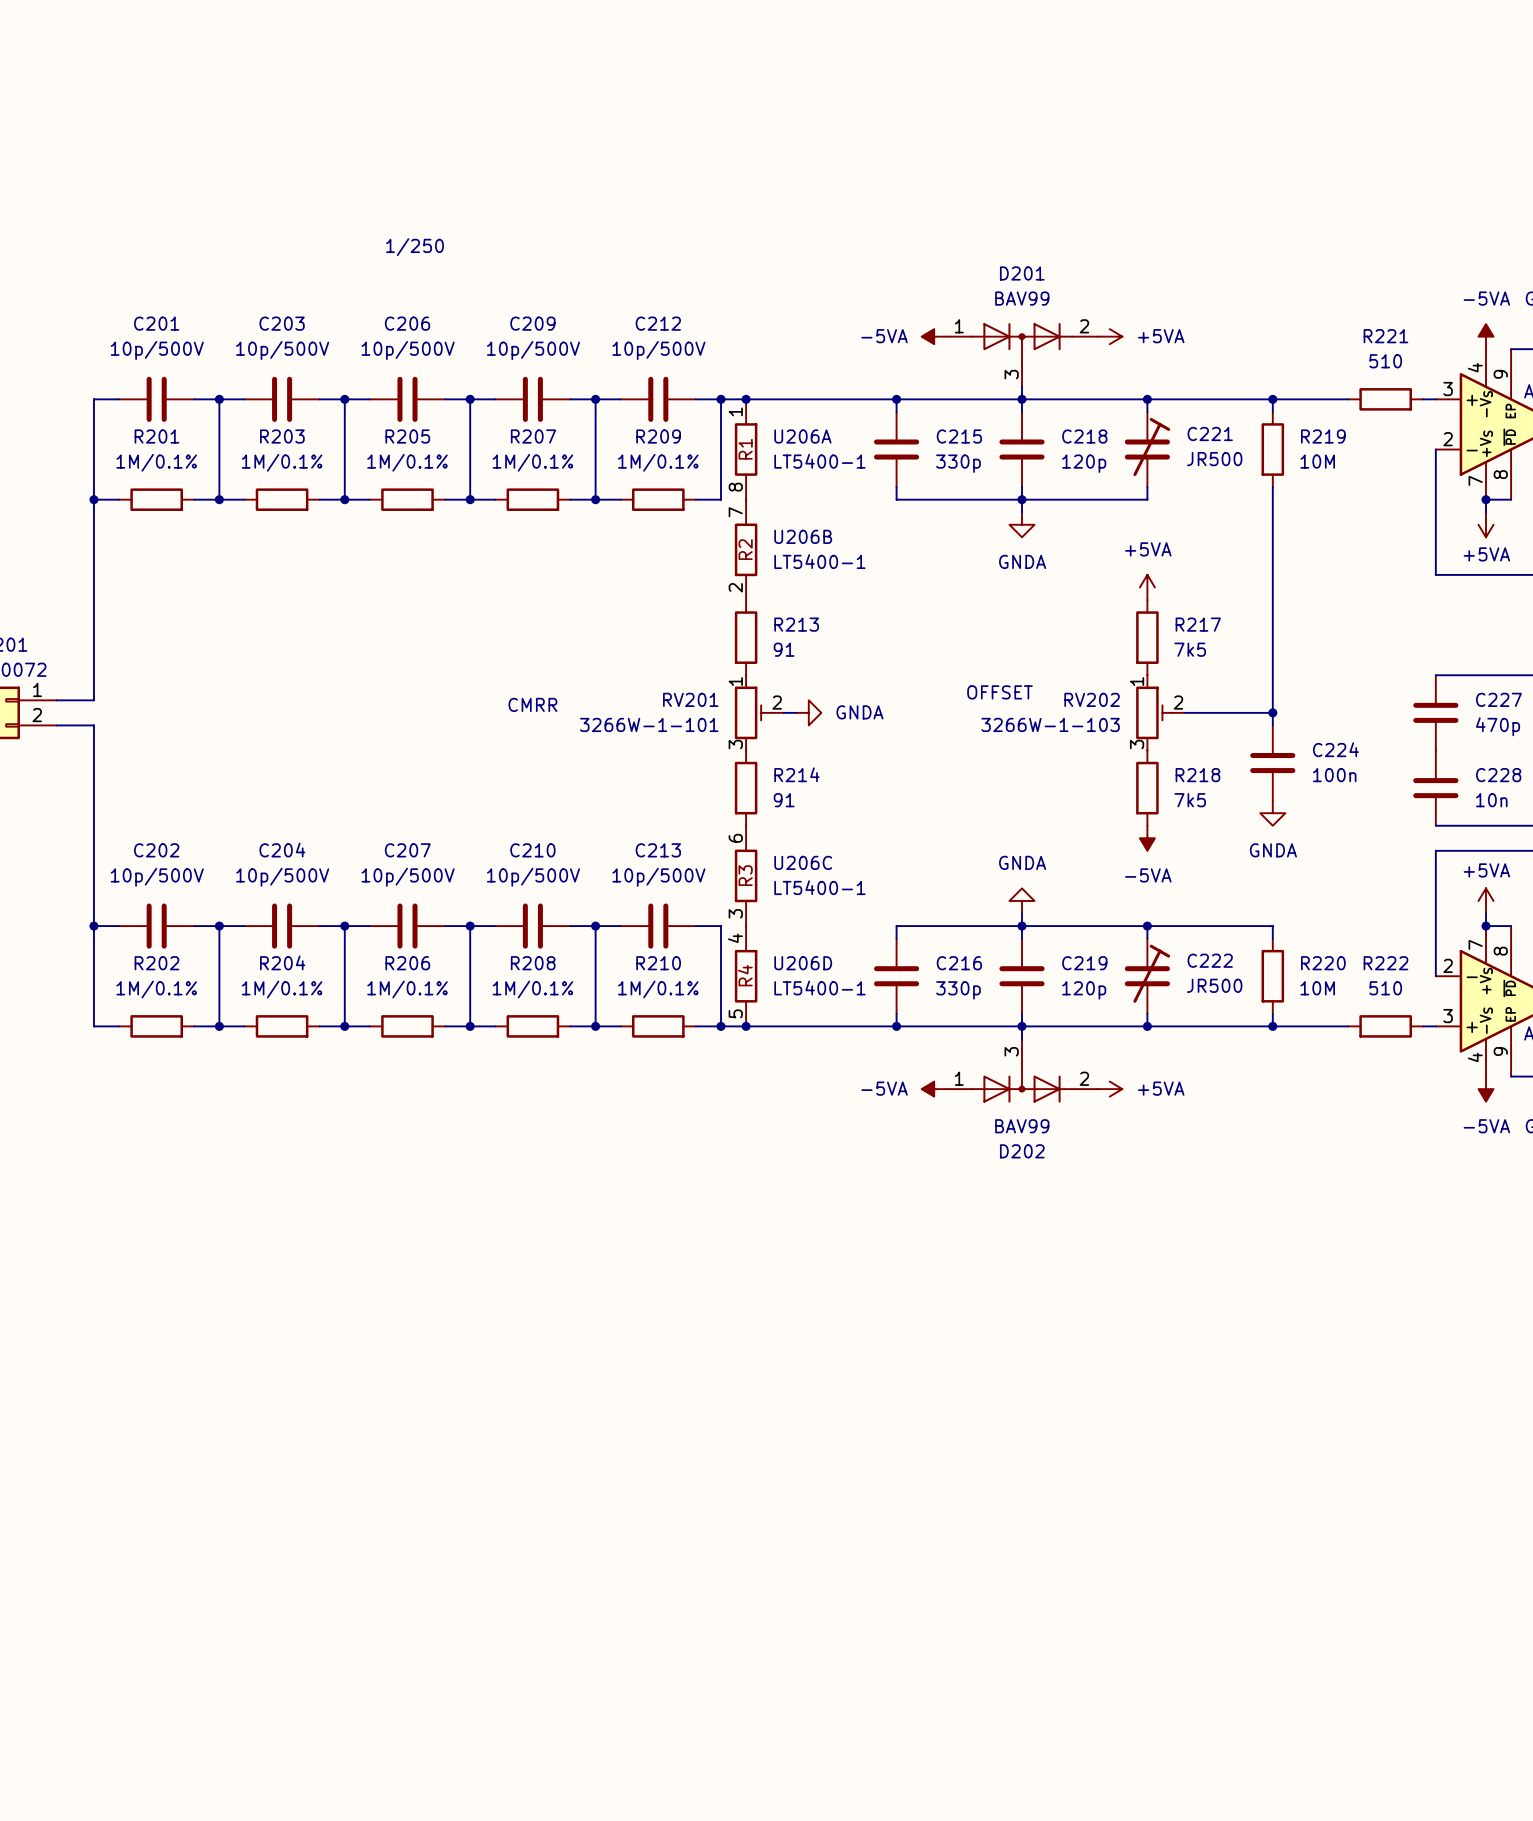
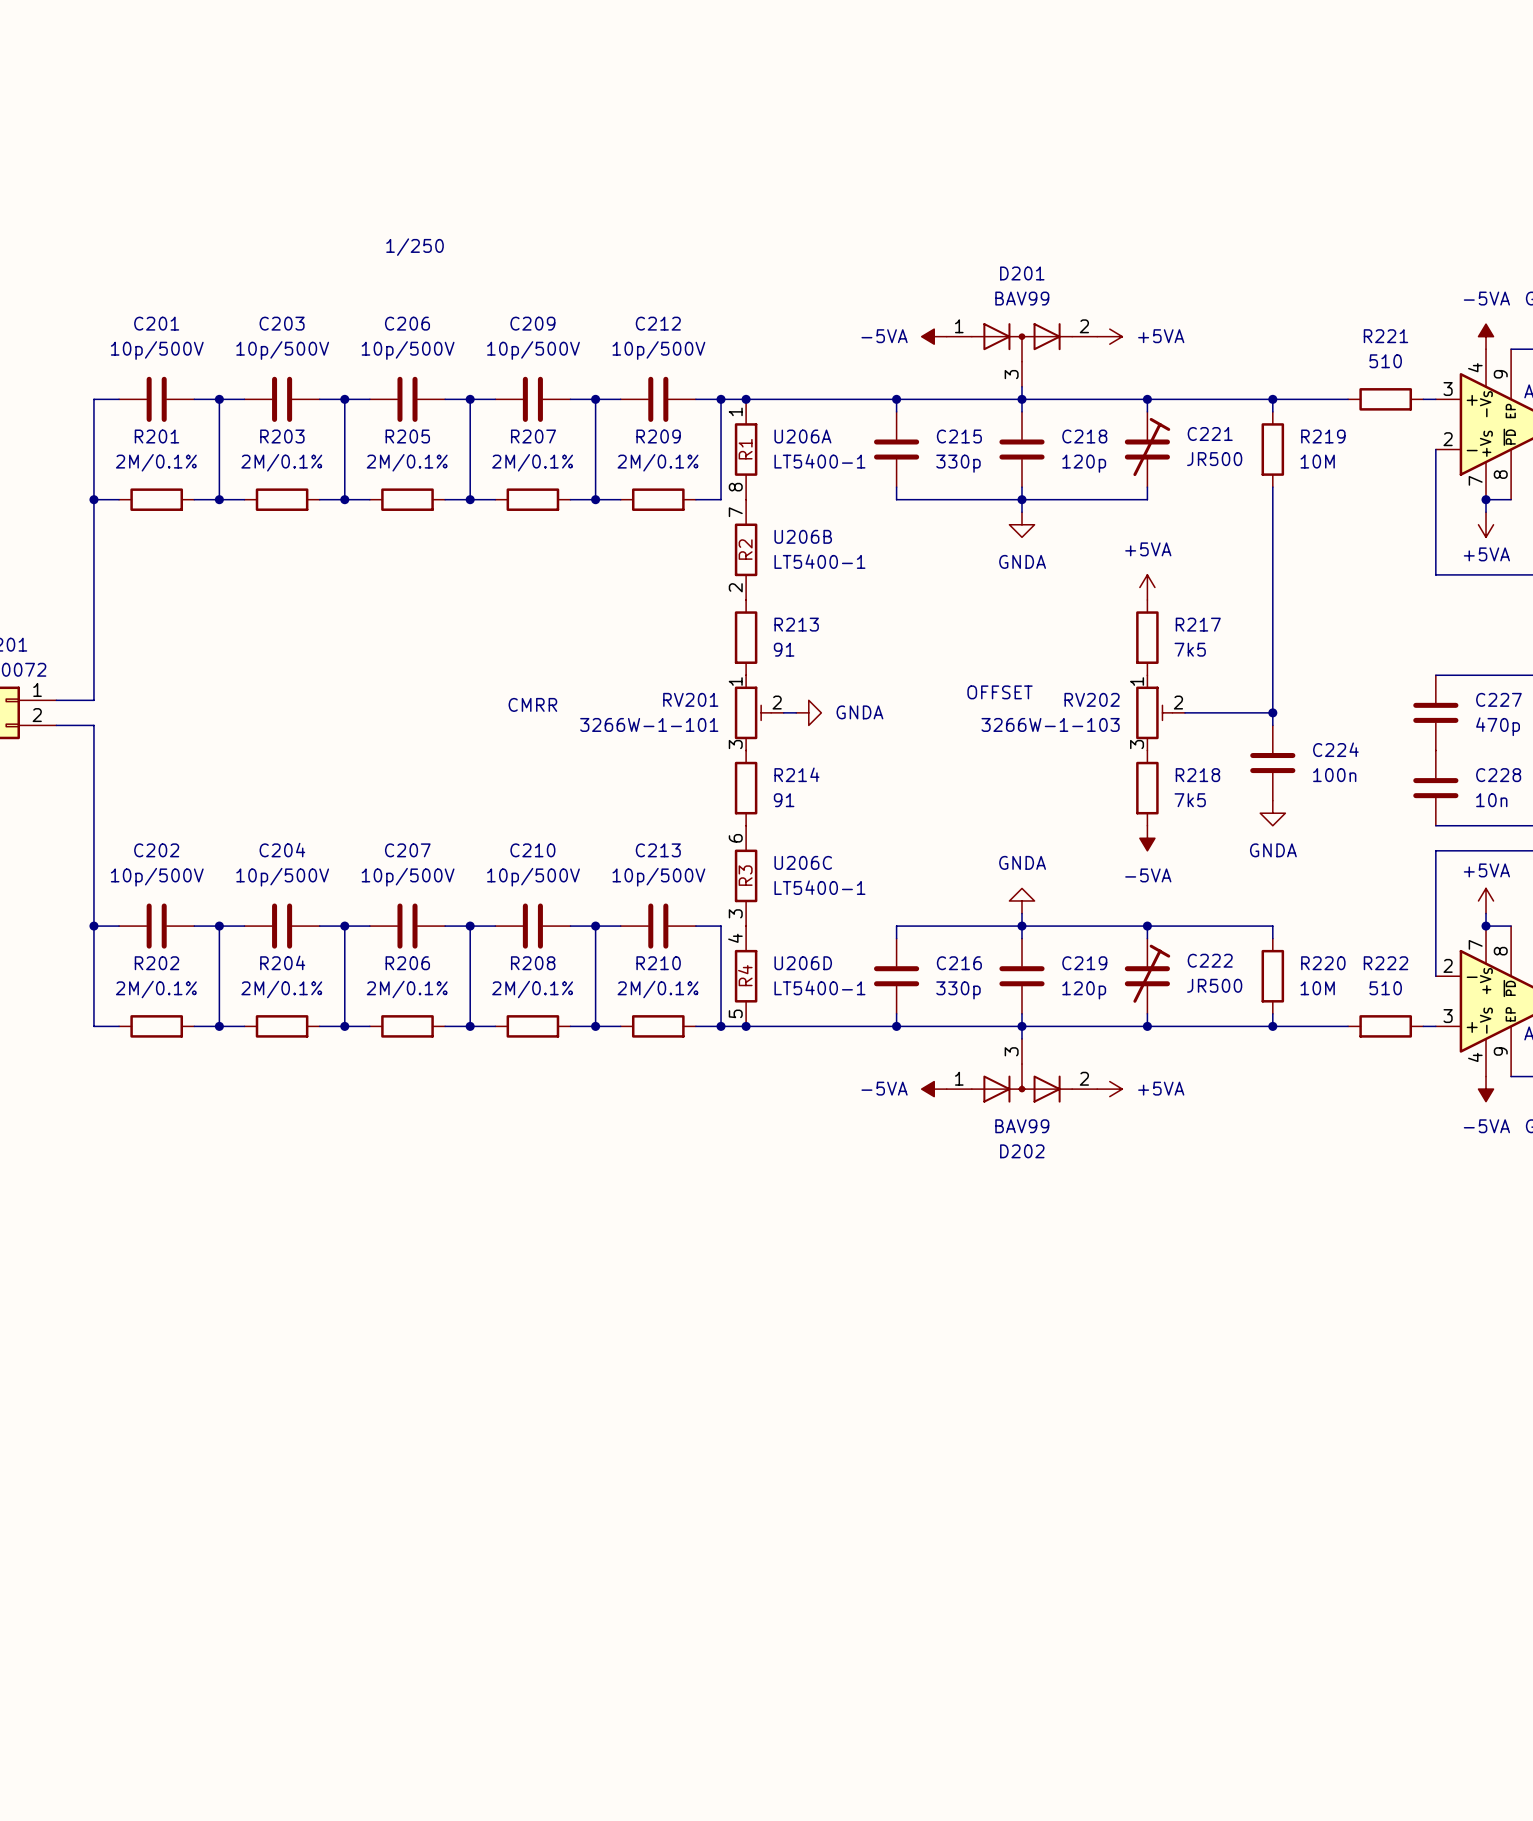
R201 value: 1M/0.1% (156, 462) -> 2M/0.1% (156, 462)
R203 value: 1M/0.1% (282, 462) -> 2M/0.1% (281, 462)
R205 value: 1M/0.1% (407, 462) -> 2M/0.1% (407, 462)
R207 value: 1M/0.1% (532, 462) -> 2M/0.1% (532, 462)
R209 value: 1M/0.1% (658, 462) -> 2M/0.1% (658, 462)
R202 value: 1M/0.1% (156, 989) -> 2M/0.1% (156, 989)
R204 value: 1M/0.1% (282, 989) -> 2M/0.1% (281, 989)
R206 value: 1M/0.1% (407, 989) -> 2M/0.1% (407, 989)
R208 value: 1M/0.1% (532, 989) -> 2M/0.1% (532, 989)
R210 value: 1M/0.1% (658, 989) -> 2M/0.1% (658, 989)

